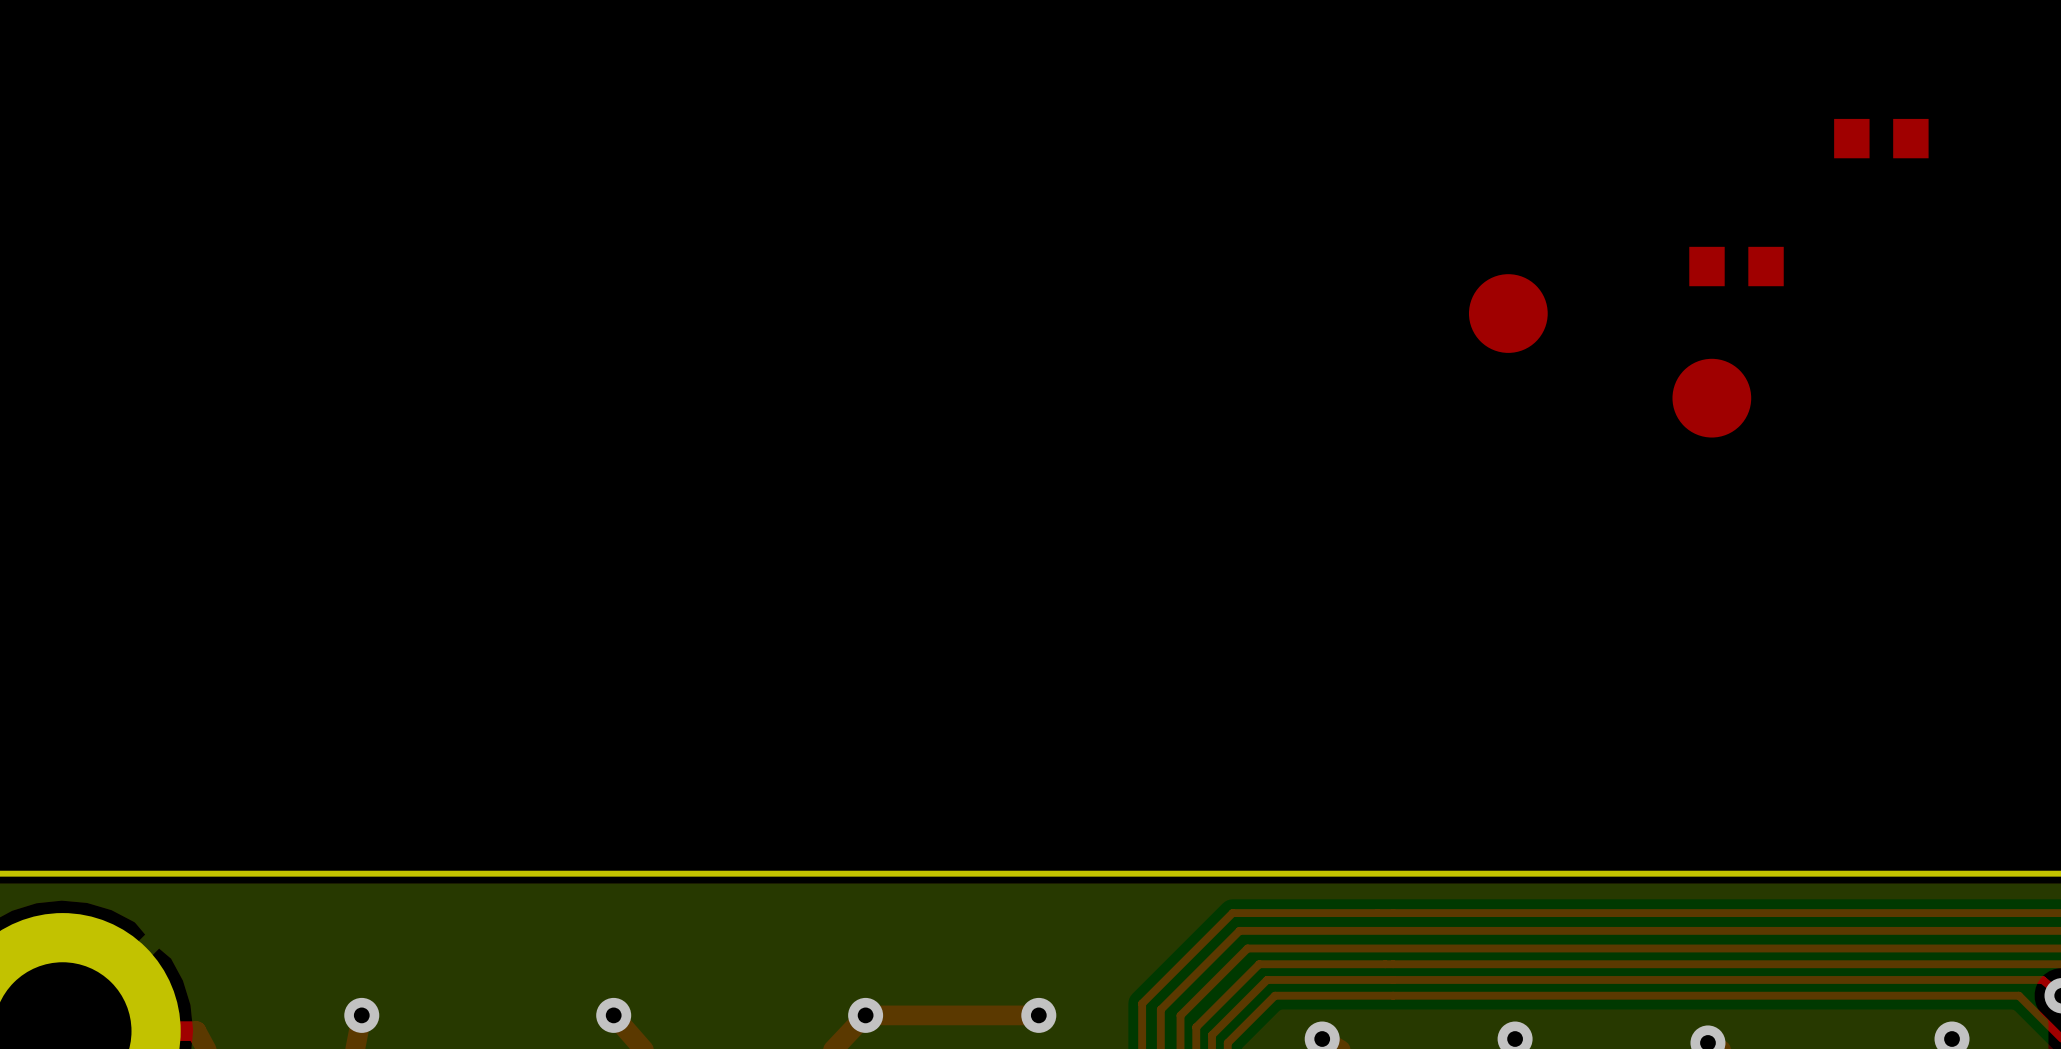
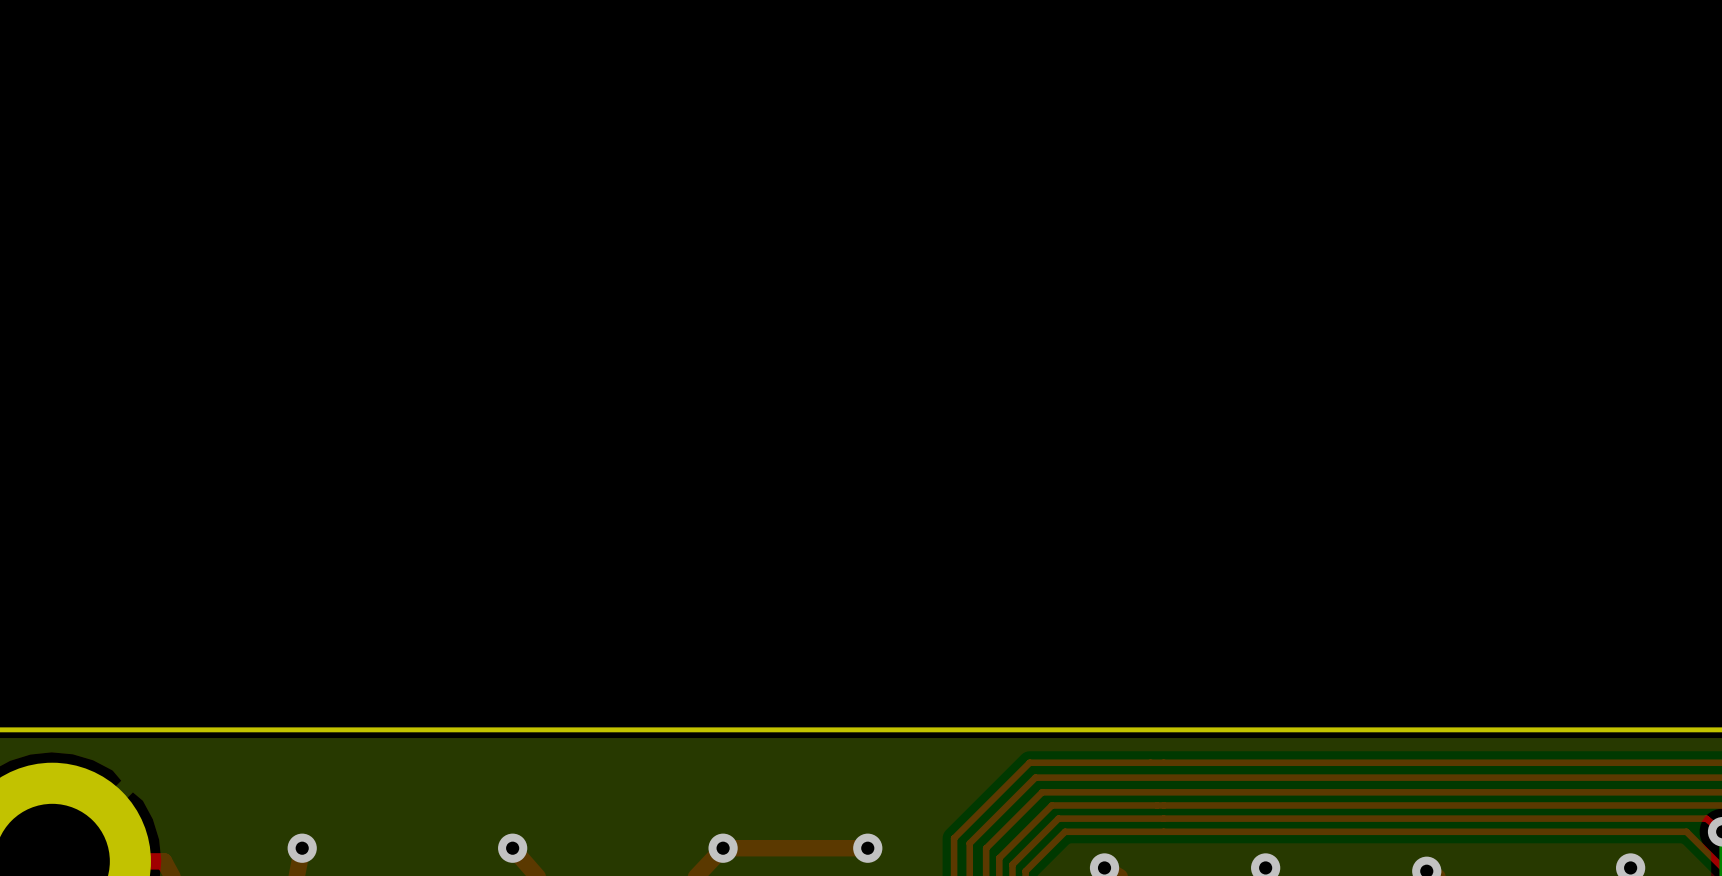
part: (1881, 138) -> none
part: (1736, 266) -> none
part: (1508, 313) -> none
part: (1711, 398) -> none

